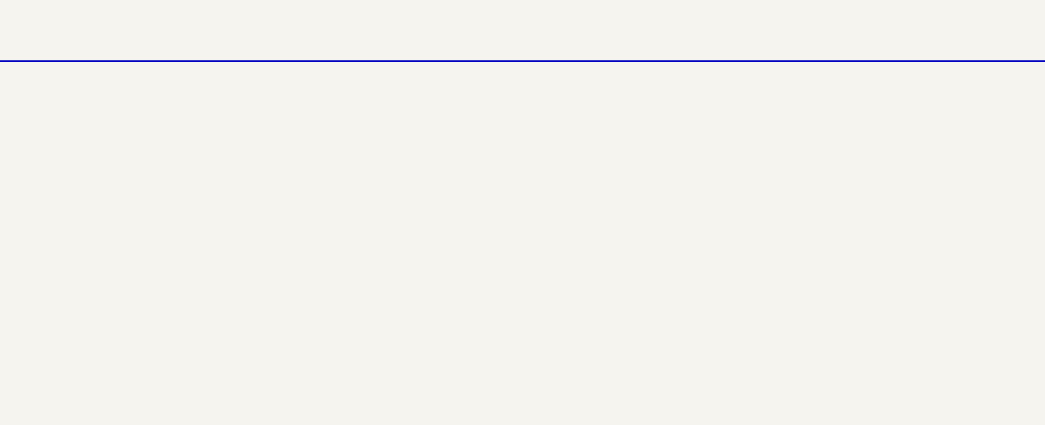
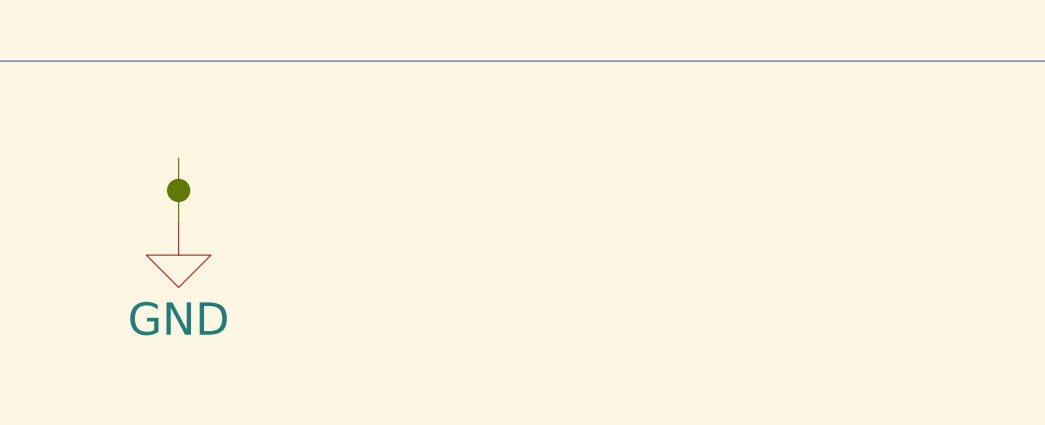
wire: none -> (178, 158) (178, 222)
junction: none -> (178, 190)
power symbol: none -> GND (178, 255)

